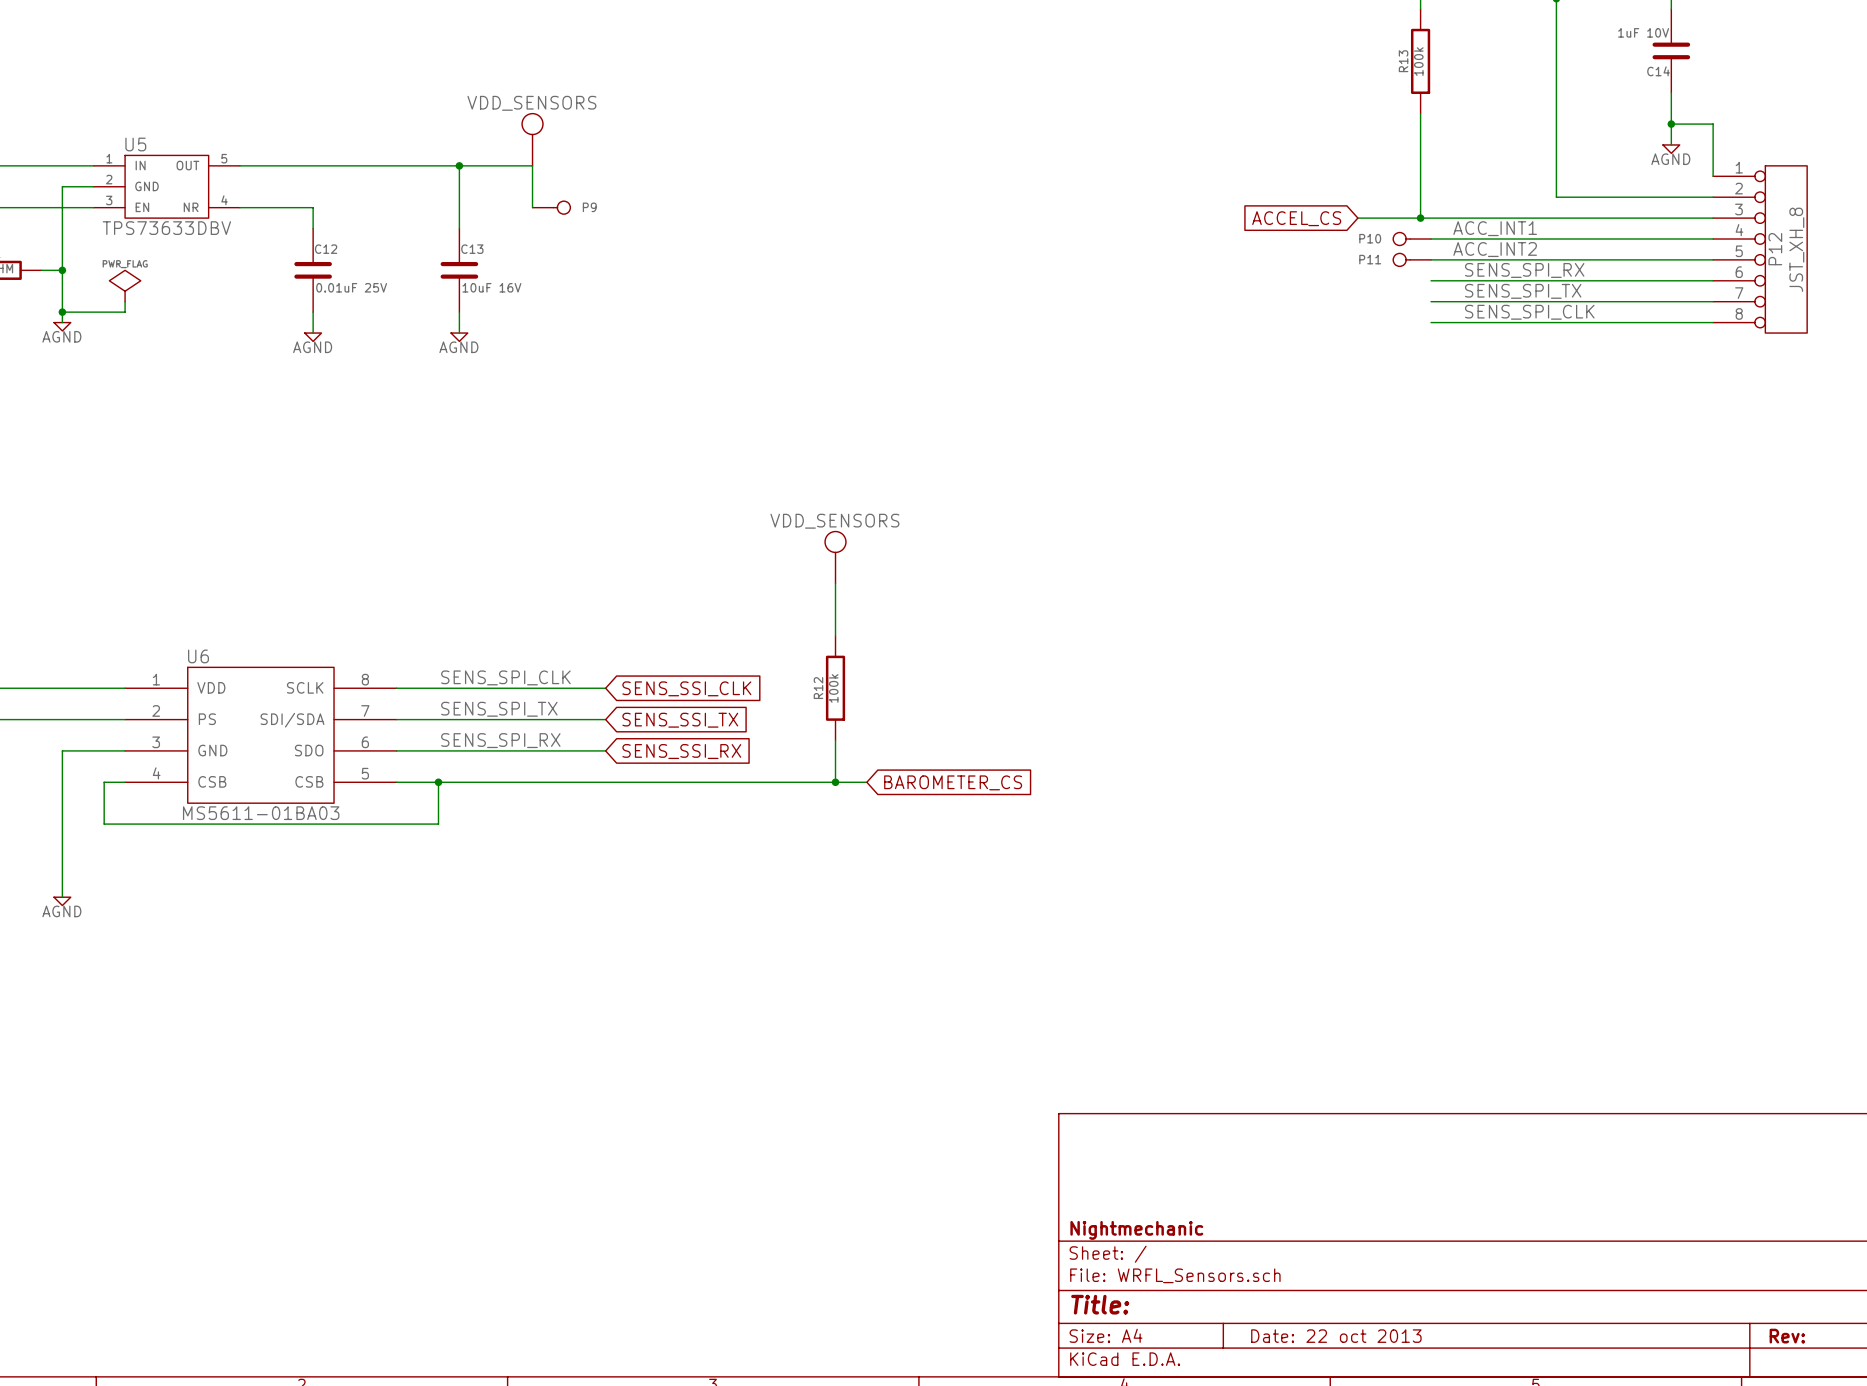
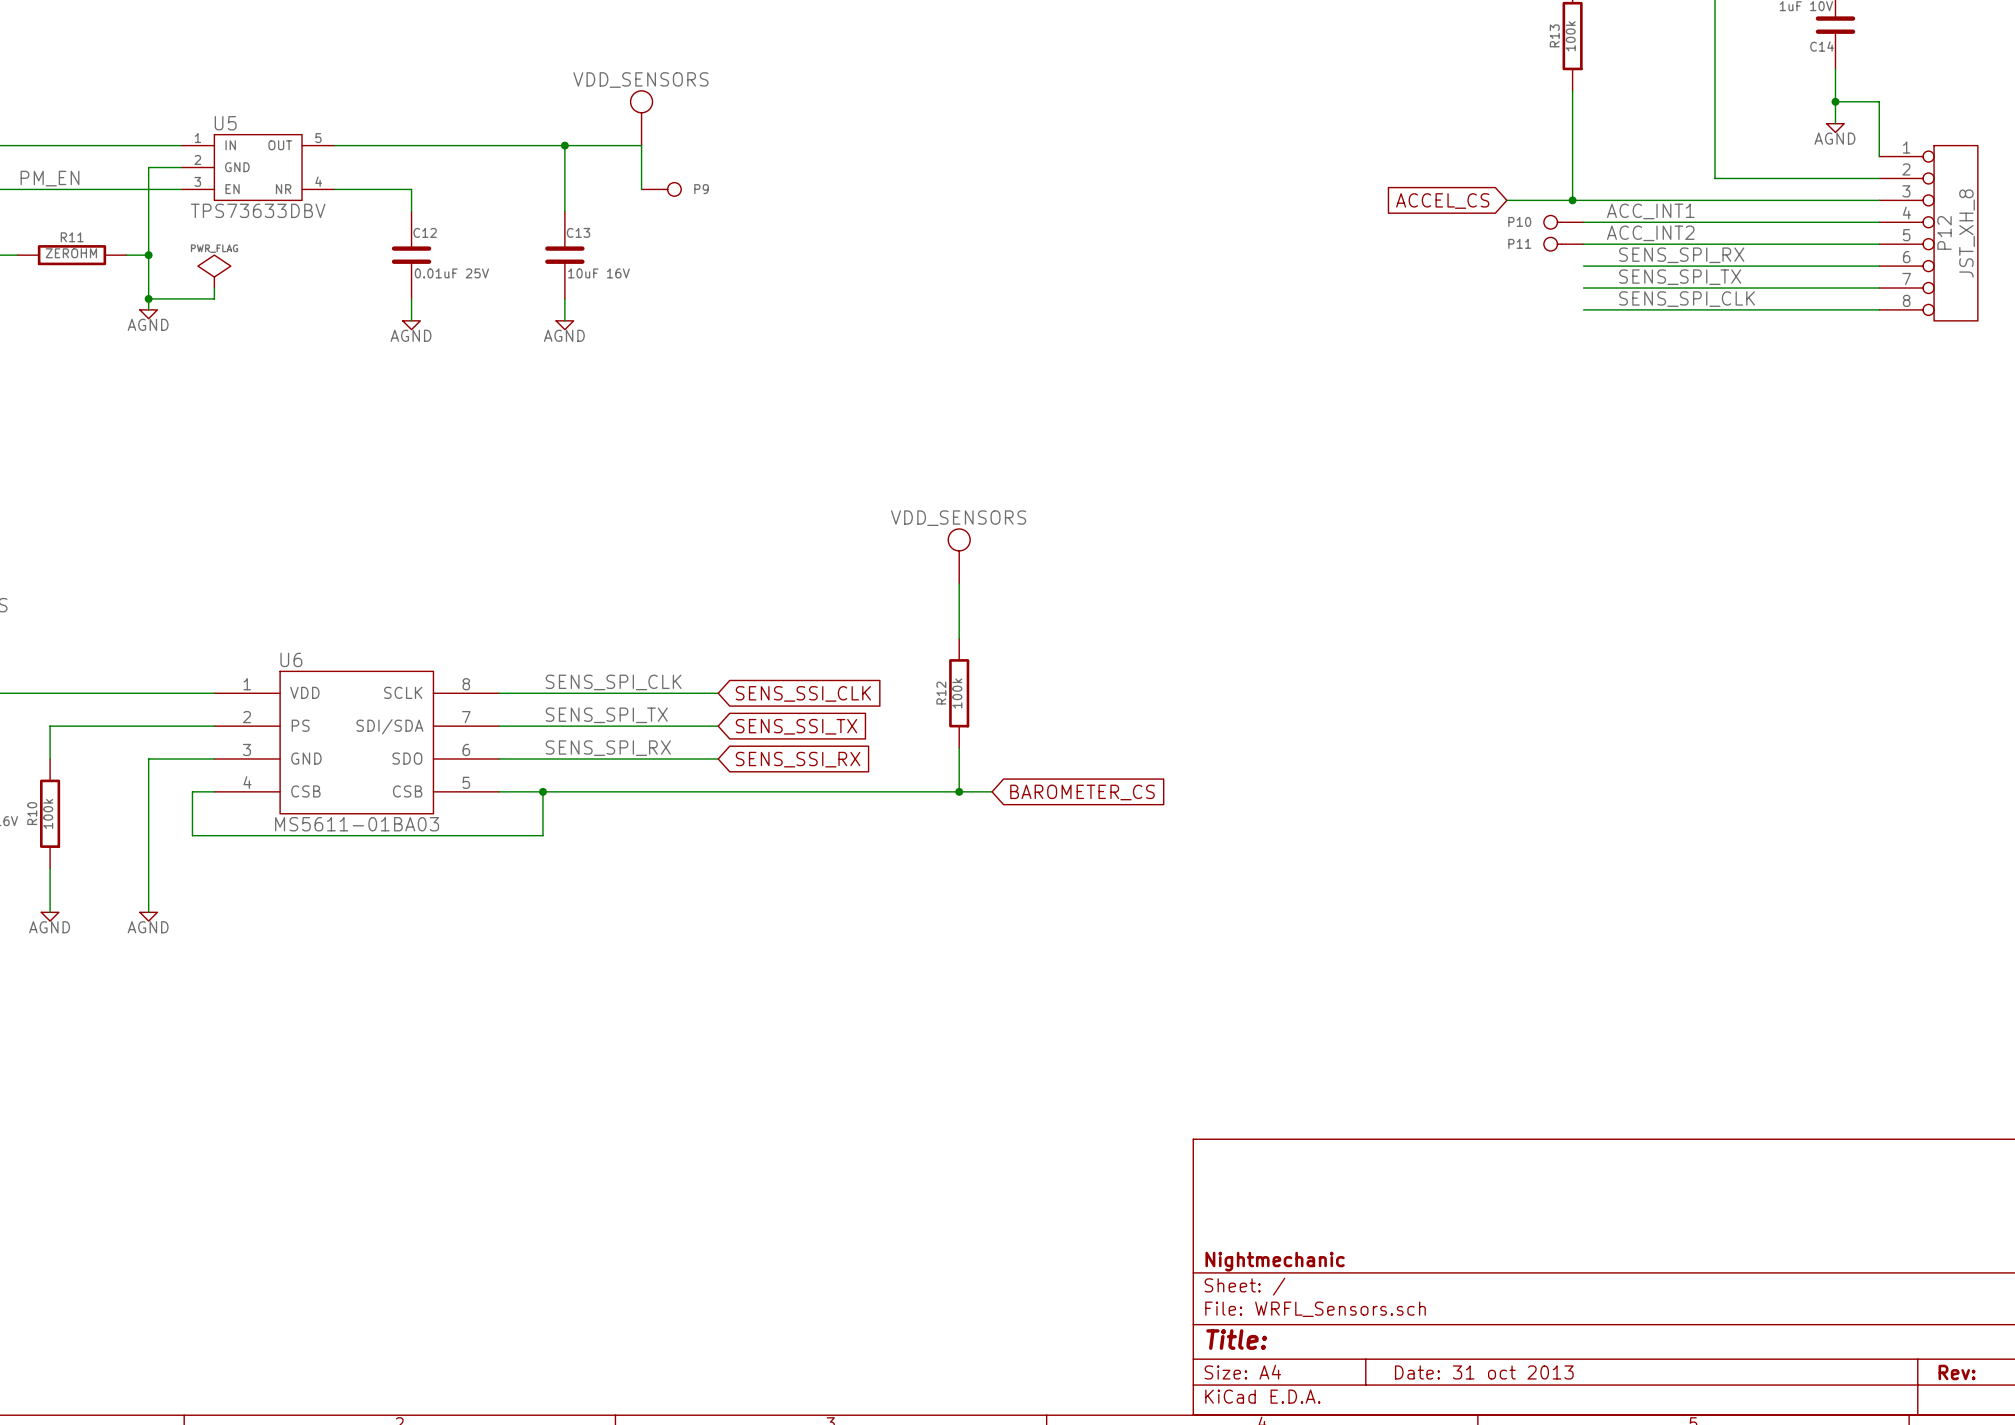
title block: Date: 22 oct 2013 (1336, 1336) -> Date: 31 oct 2013 (1484, 1372)

